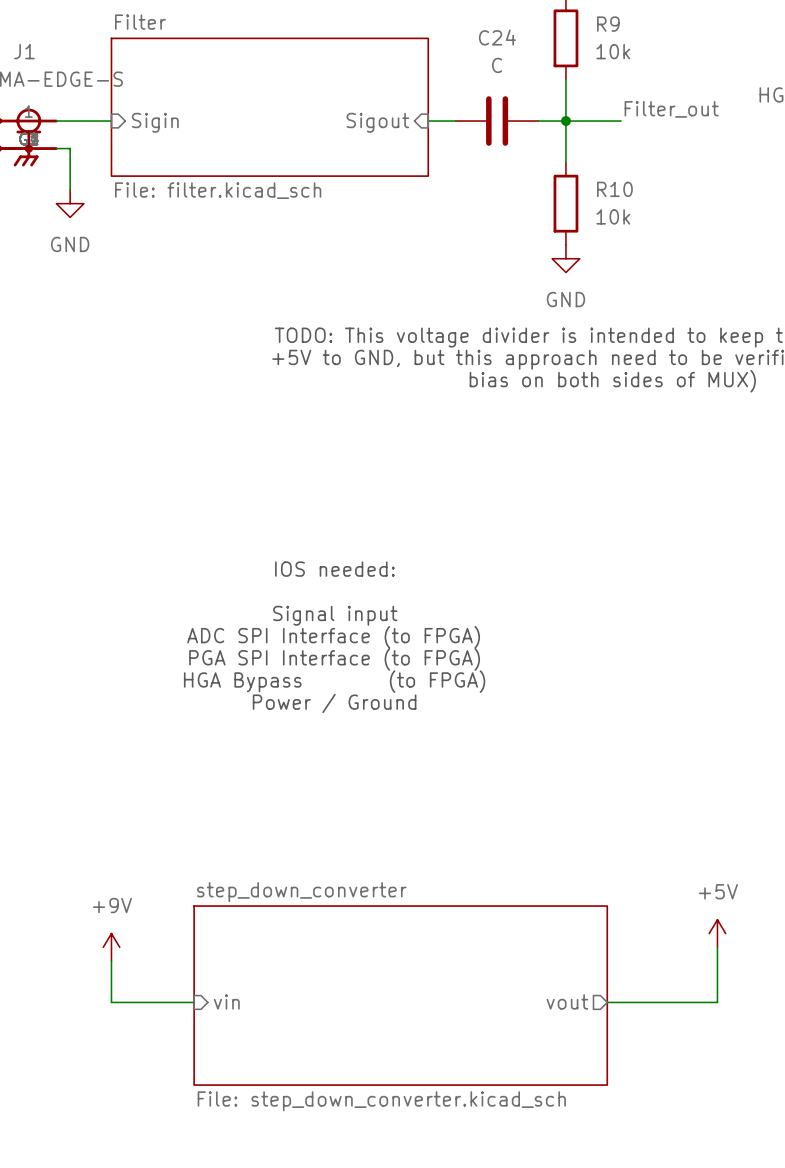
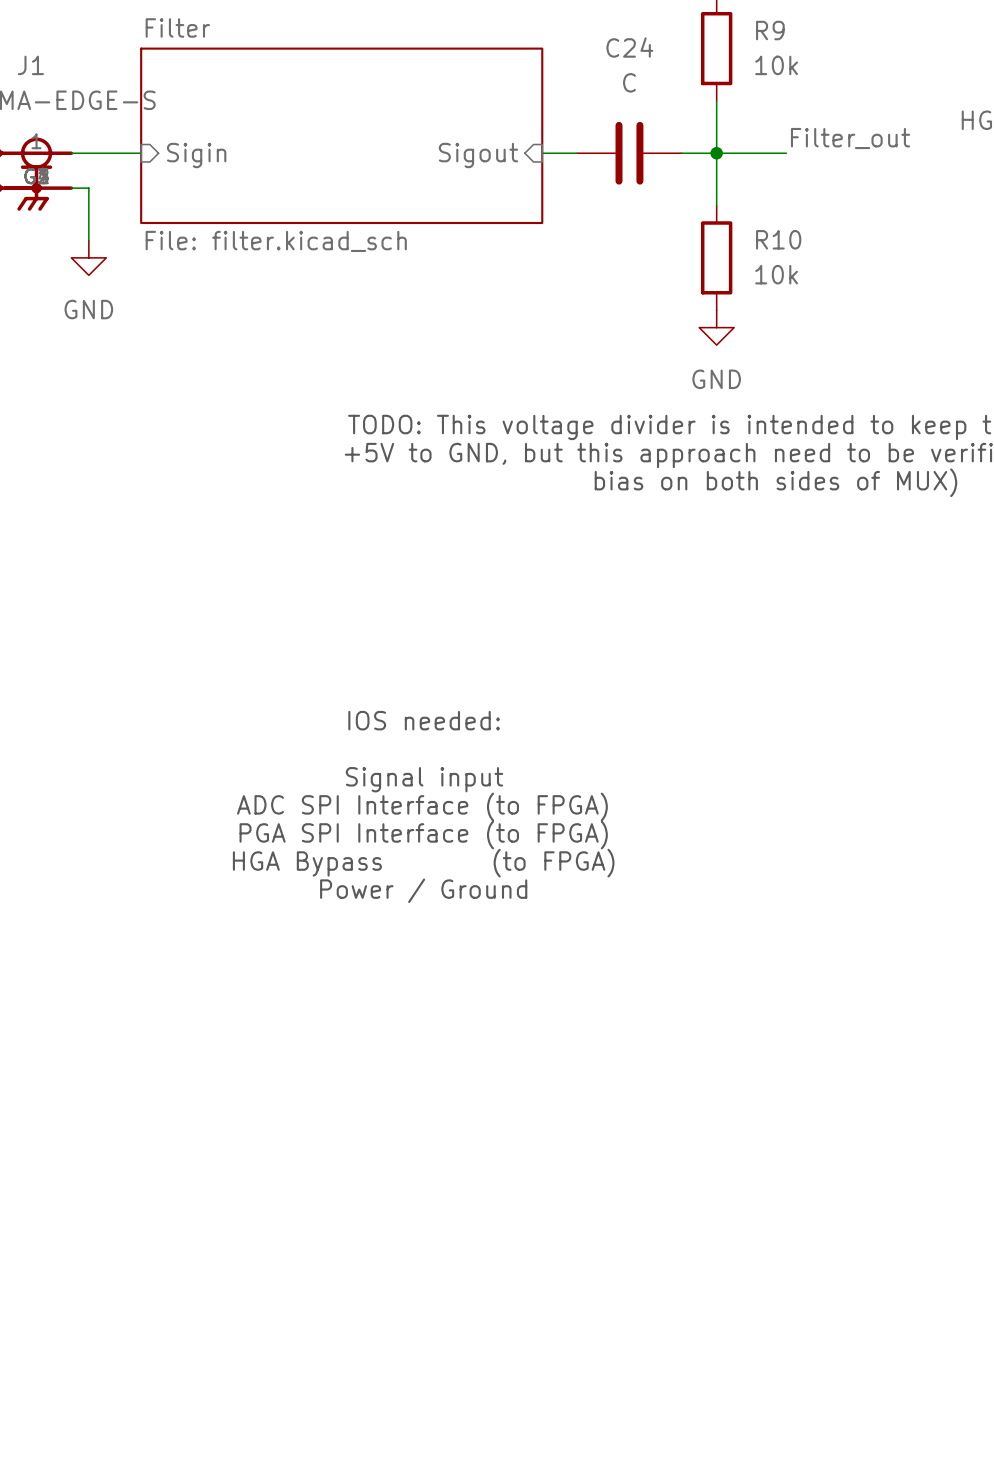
power symbol: +5V (717, 933) -> none
power symbol: +9V (111, 947) -> none
wire: (717, 947) (717, 1002) (607, 1002) -> none
wire: (111, 961) (111, 1002) (194, 1002) -> none
sheet step_down_converter: File: step_down_converter.kicad_sch (400, 995) -> none
sheet pin: vin (226, 1001) -> none
sheet pin: vout (567, 1001) -> none

